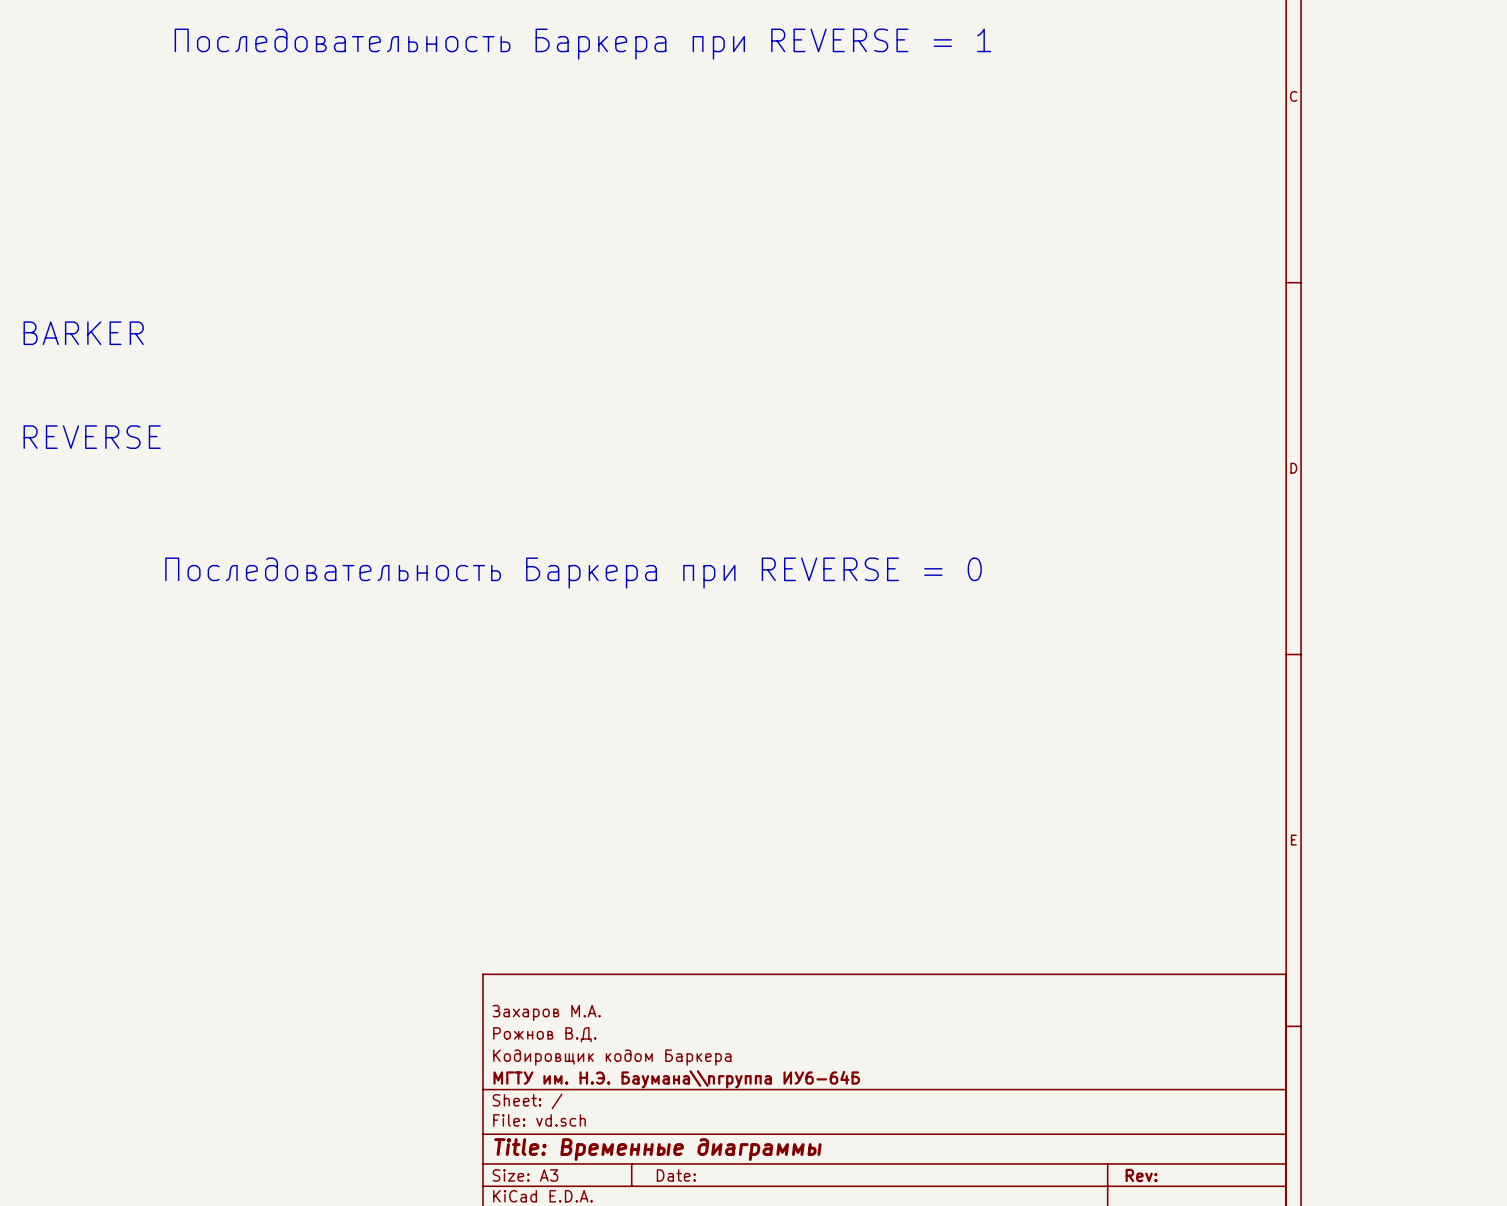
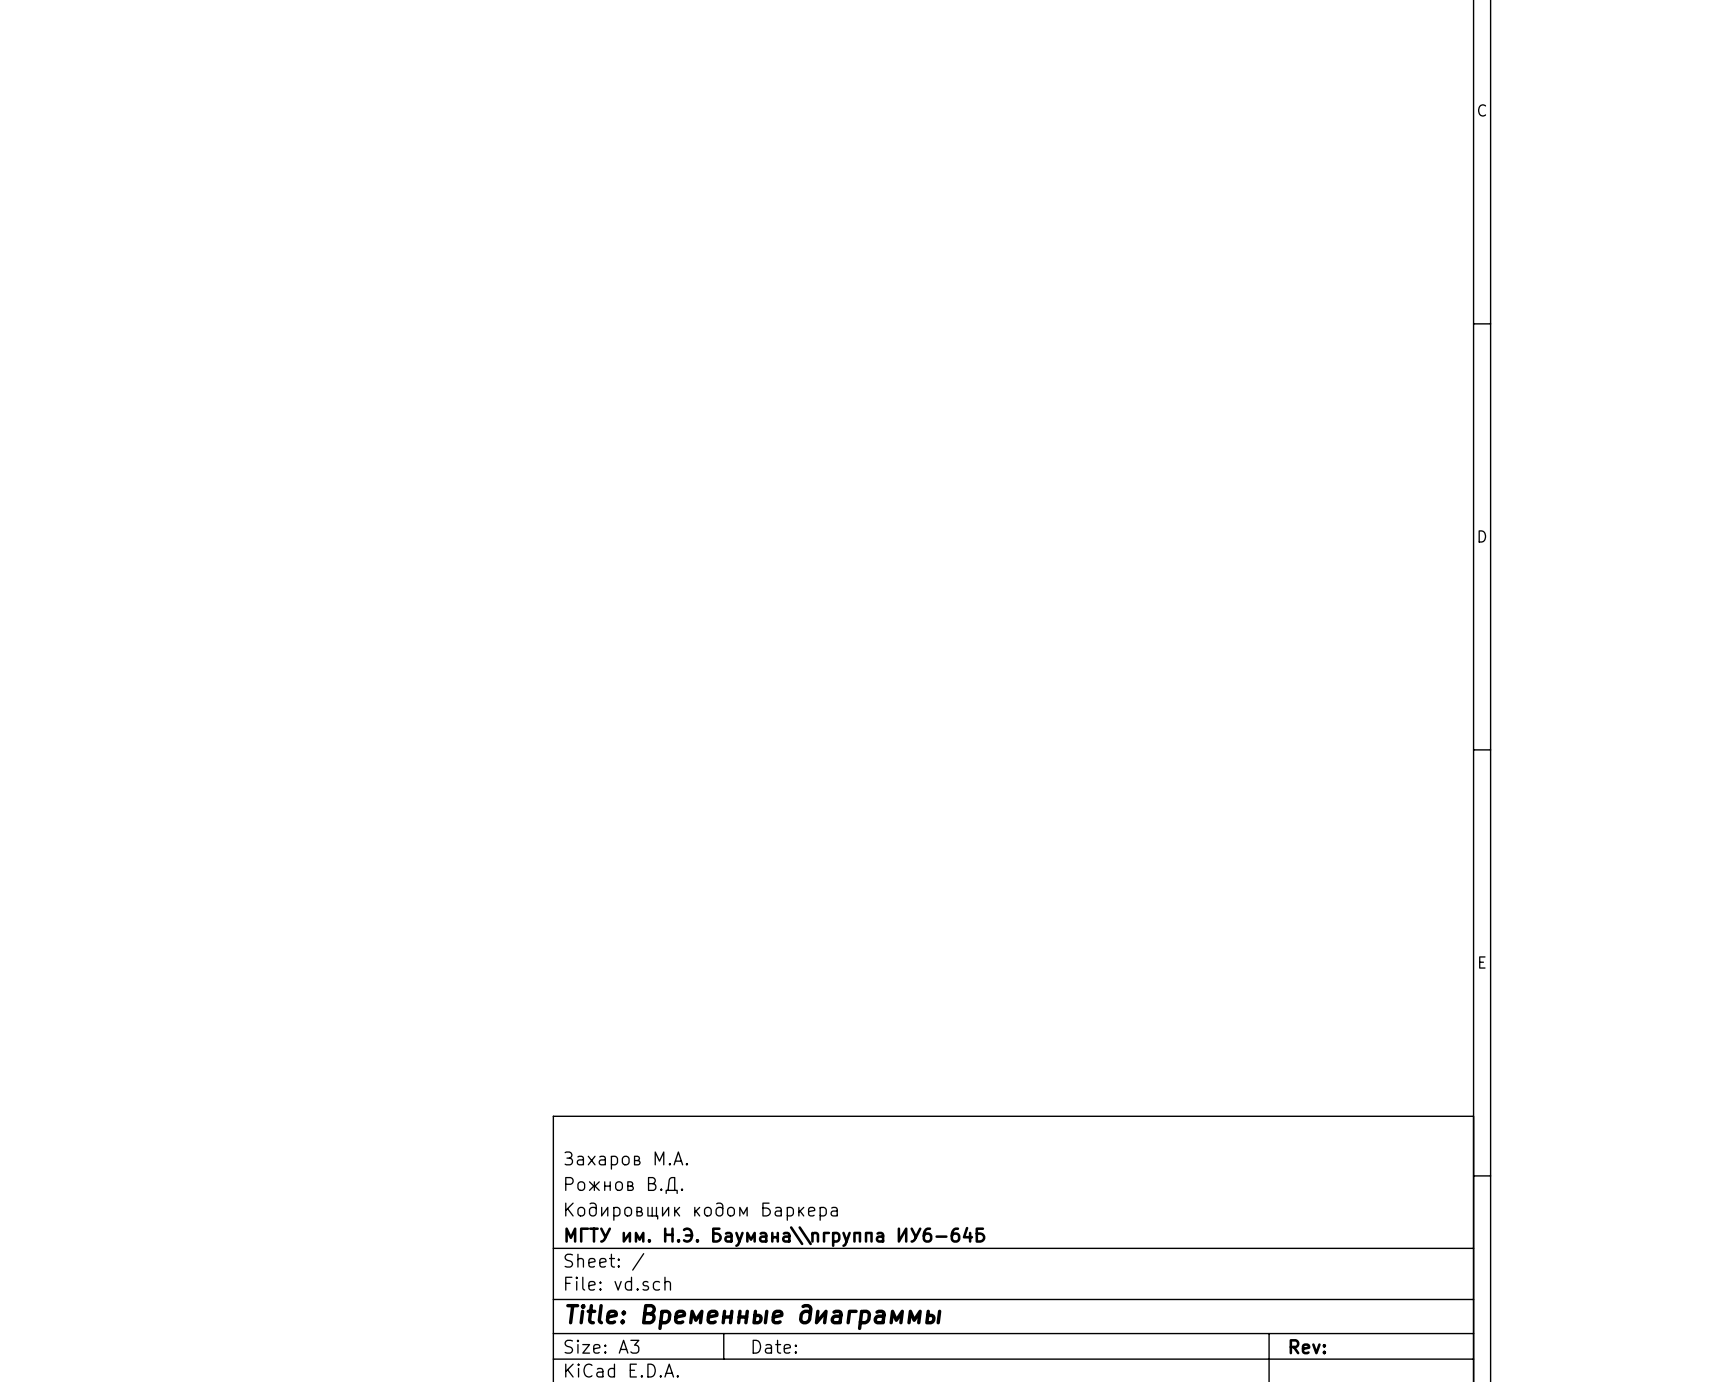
text: Последовательность Баркера при REVERSE = 1 (582, 44) -> none
text: BARKER (83, 333) -> none
text: REVERSE (92, 437) -> none
text: Последовательность Баркера при REVERSE = 0 (573, 573) -> none

